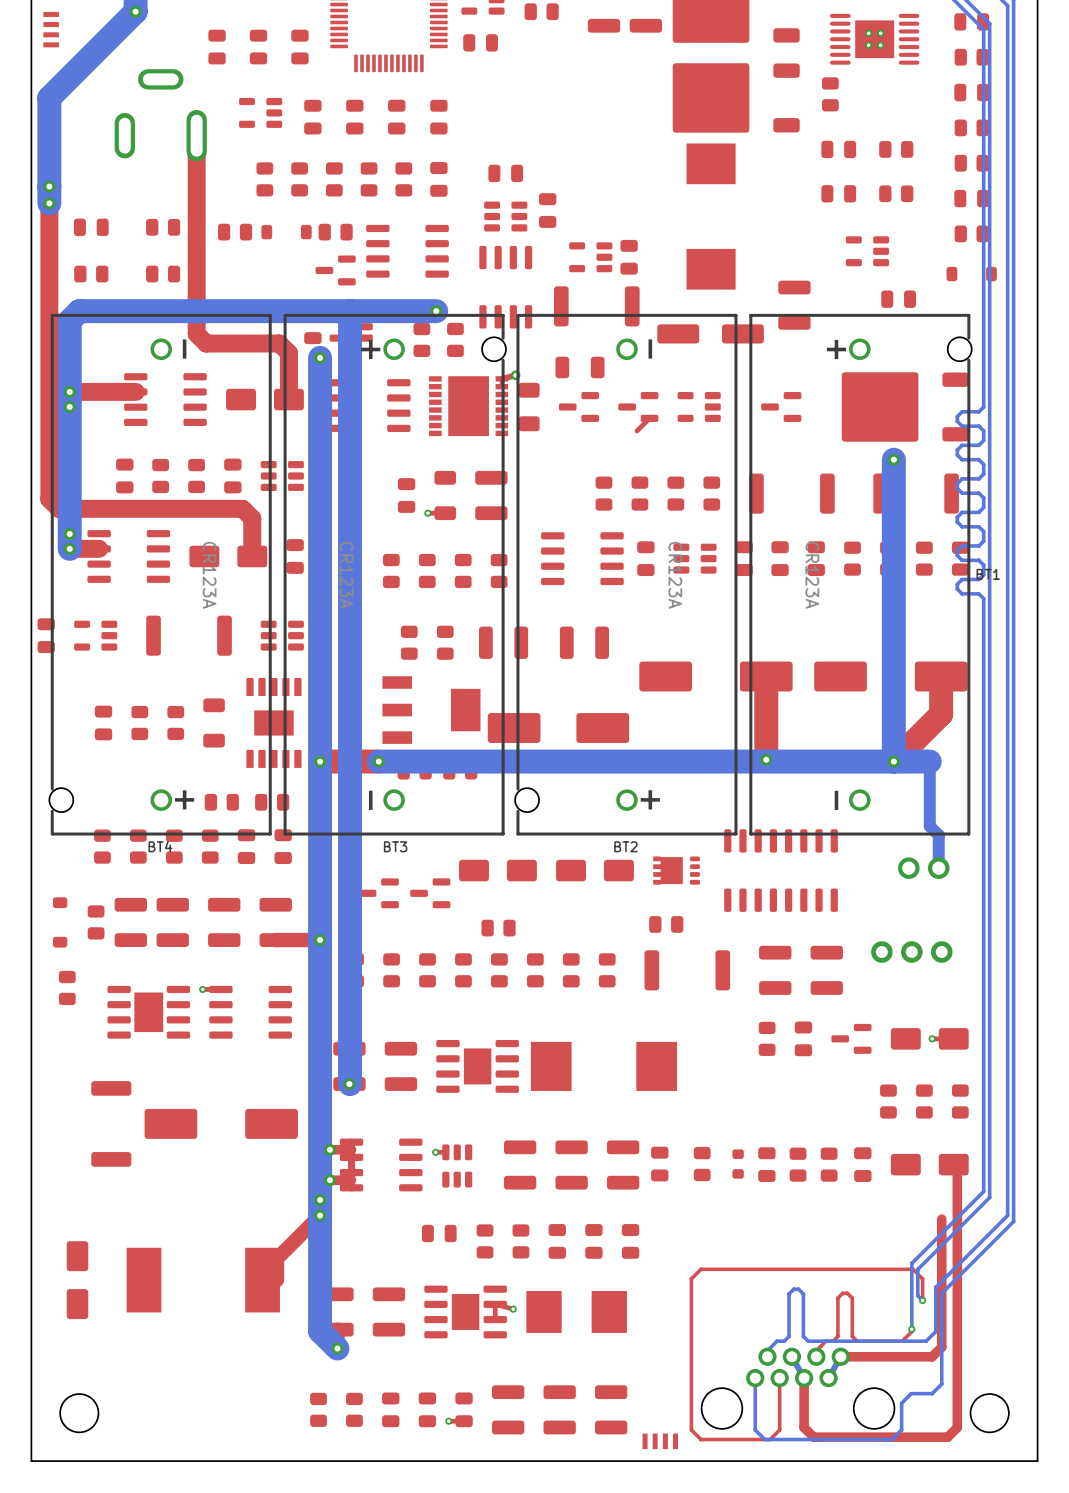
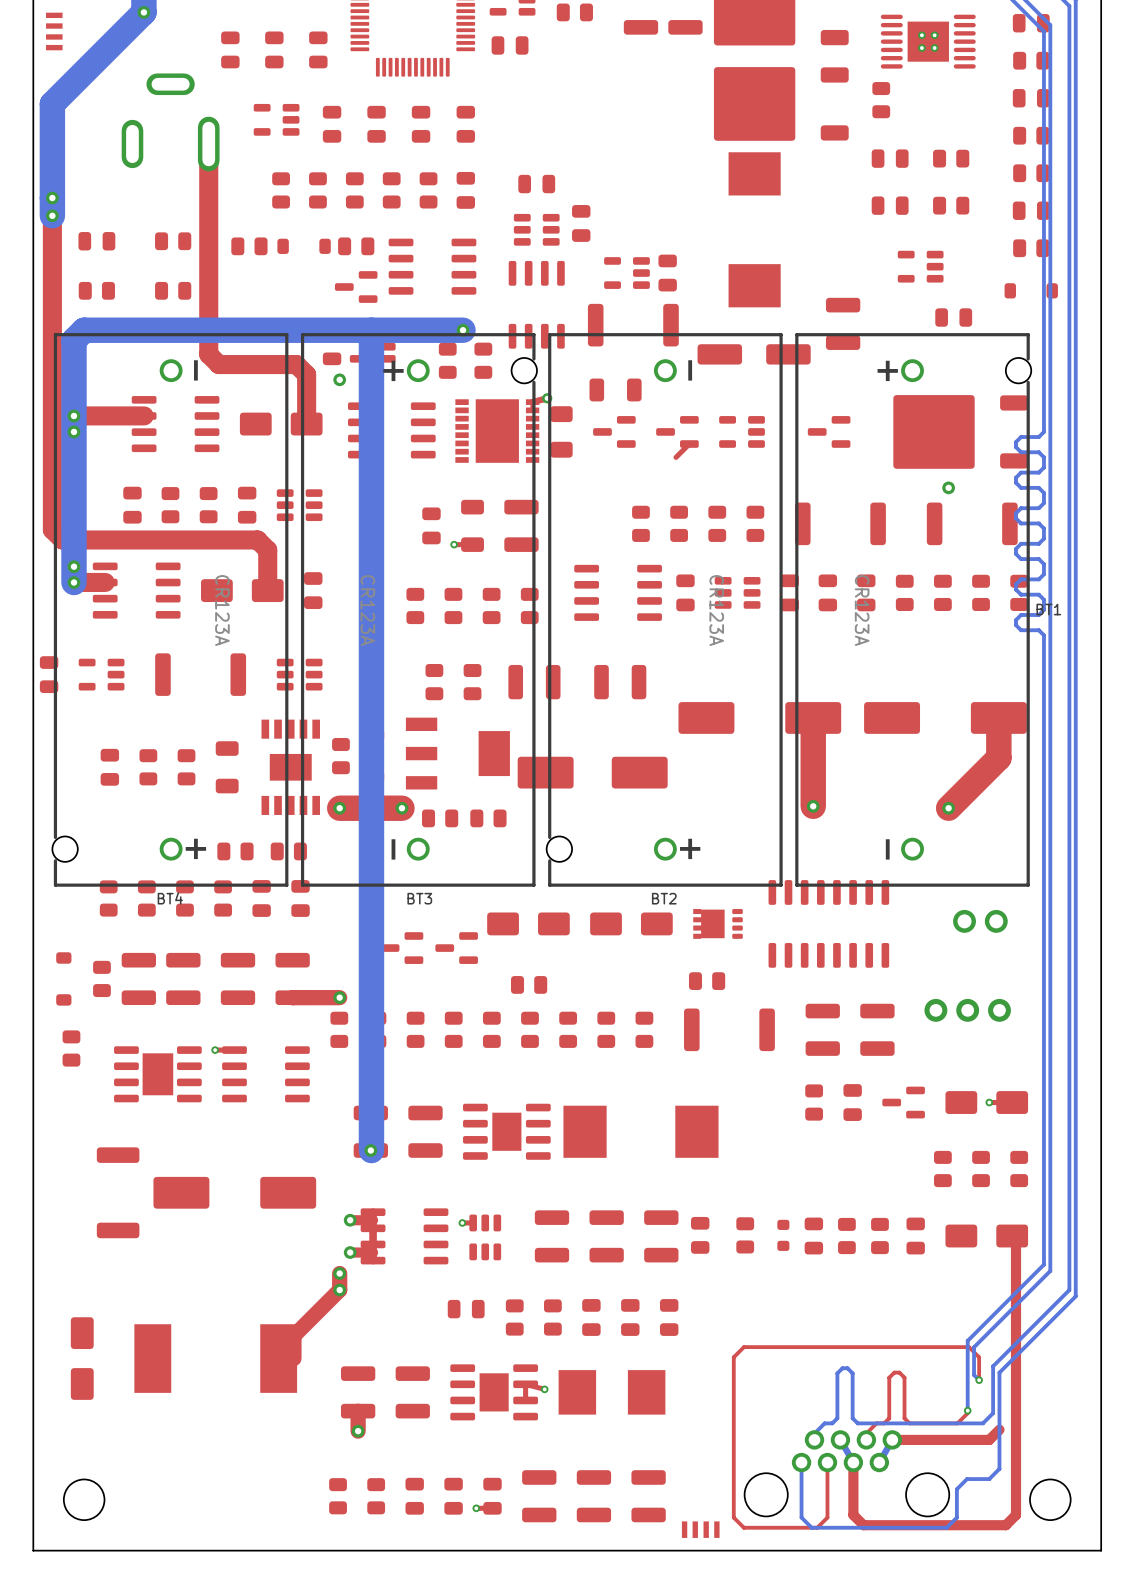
bottom track: (320, 357) (320, 1331) (337, 1348) -> none
bottom track: (893, 459) (893, 761) -> none
bottom track: (378, 761) (929, 761) (929, 826) (938, 835) (938, 868) -> none
top track: (941, 1219) (941, 1347) -> none

